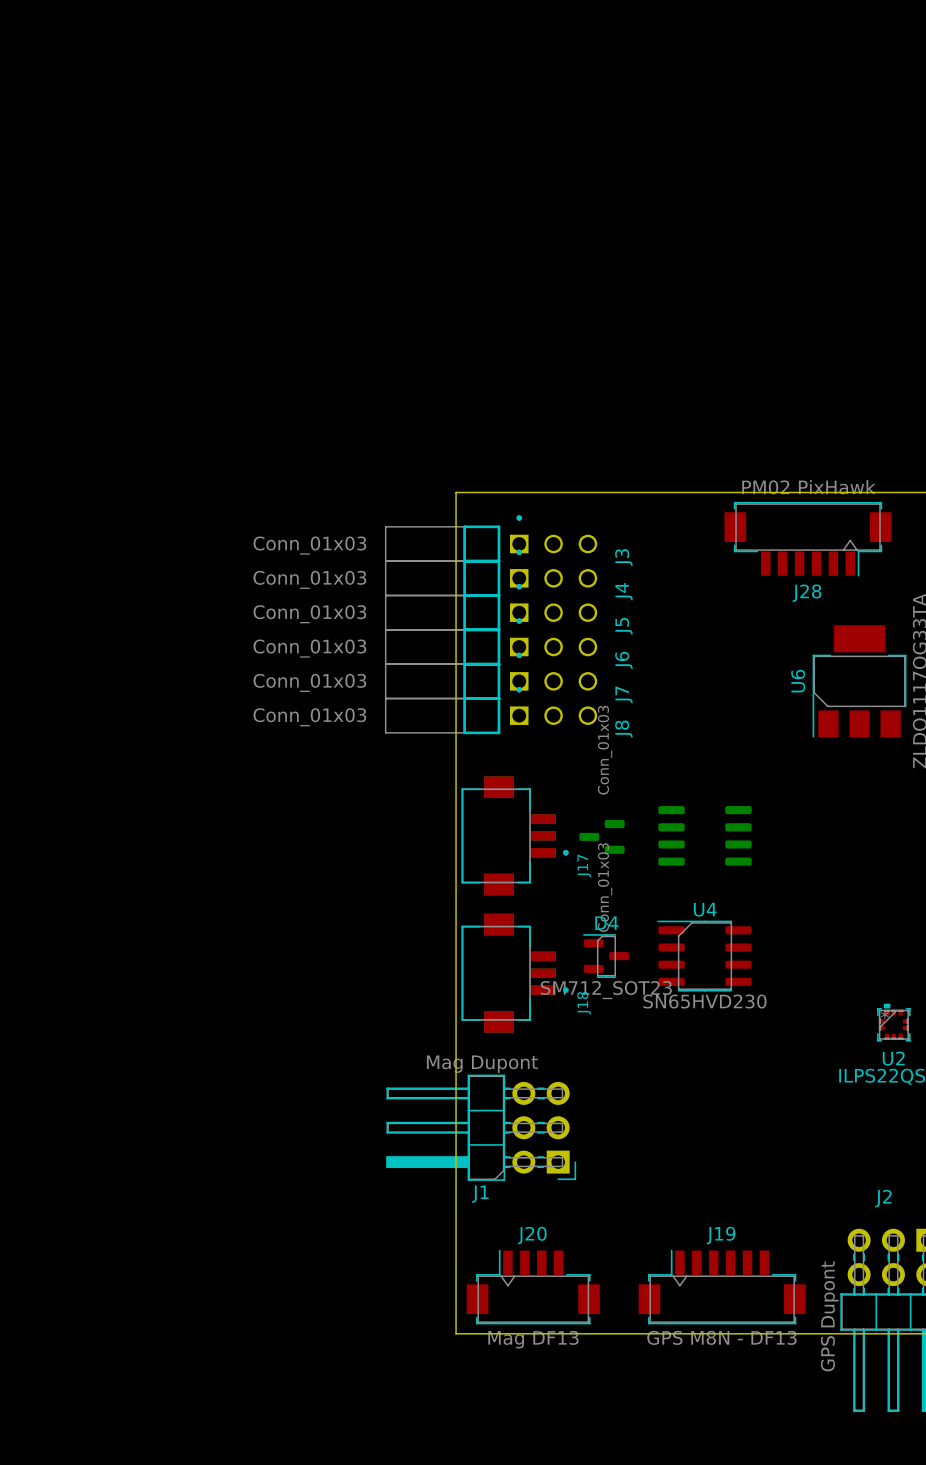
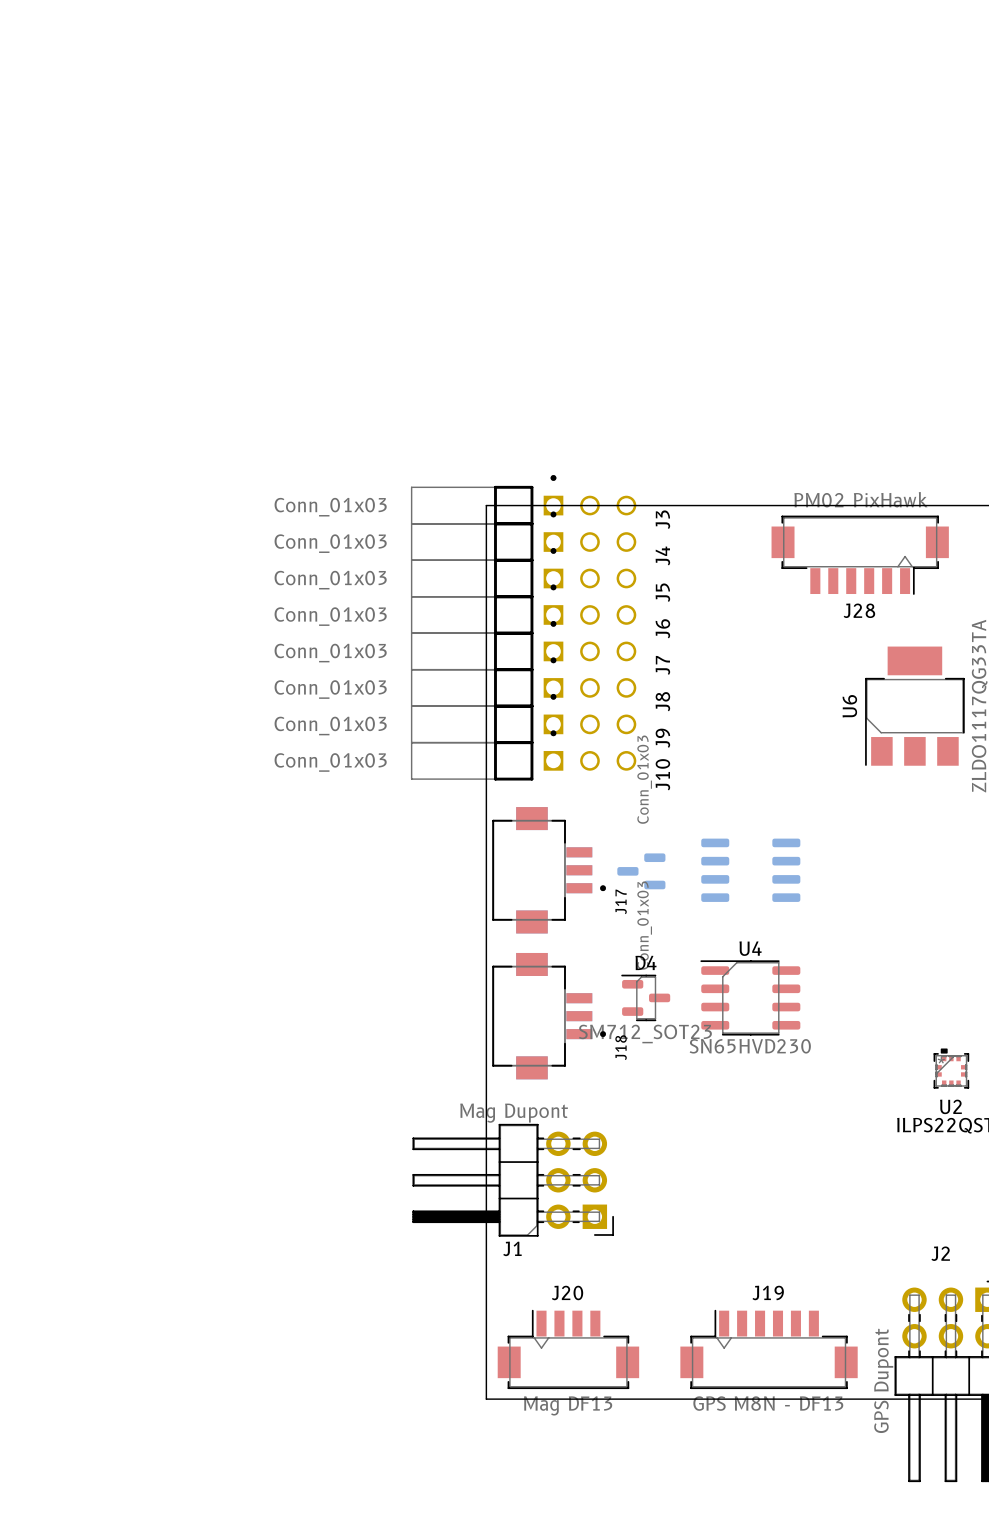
J3 position: (491, 538) -> (523, 500)
J4 position: (491, 573) -> (523, 536)
J5 position: (491, 607) -> (523, 573)
J6 position: (491, 641) -> (523, 609)
J7 position: (491, 676) -> (523, 646)
J9: none -> Conn_01x03 (523, 719)
J8 position: (491, 710) -> (523, 682)
J10: none -> Conn_01x03 (523, 755)

